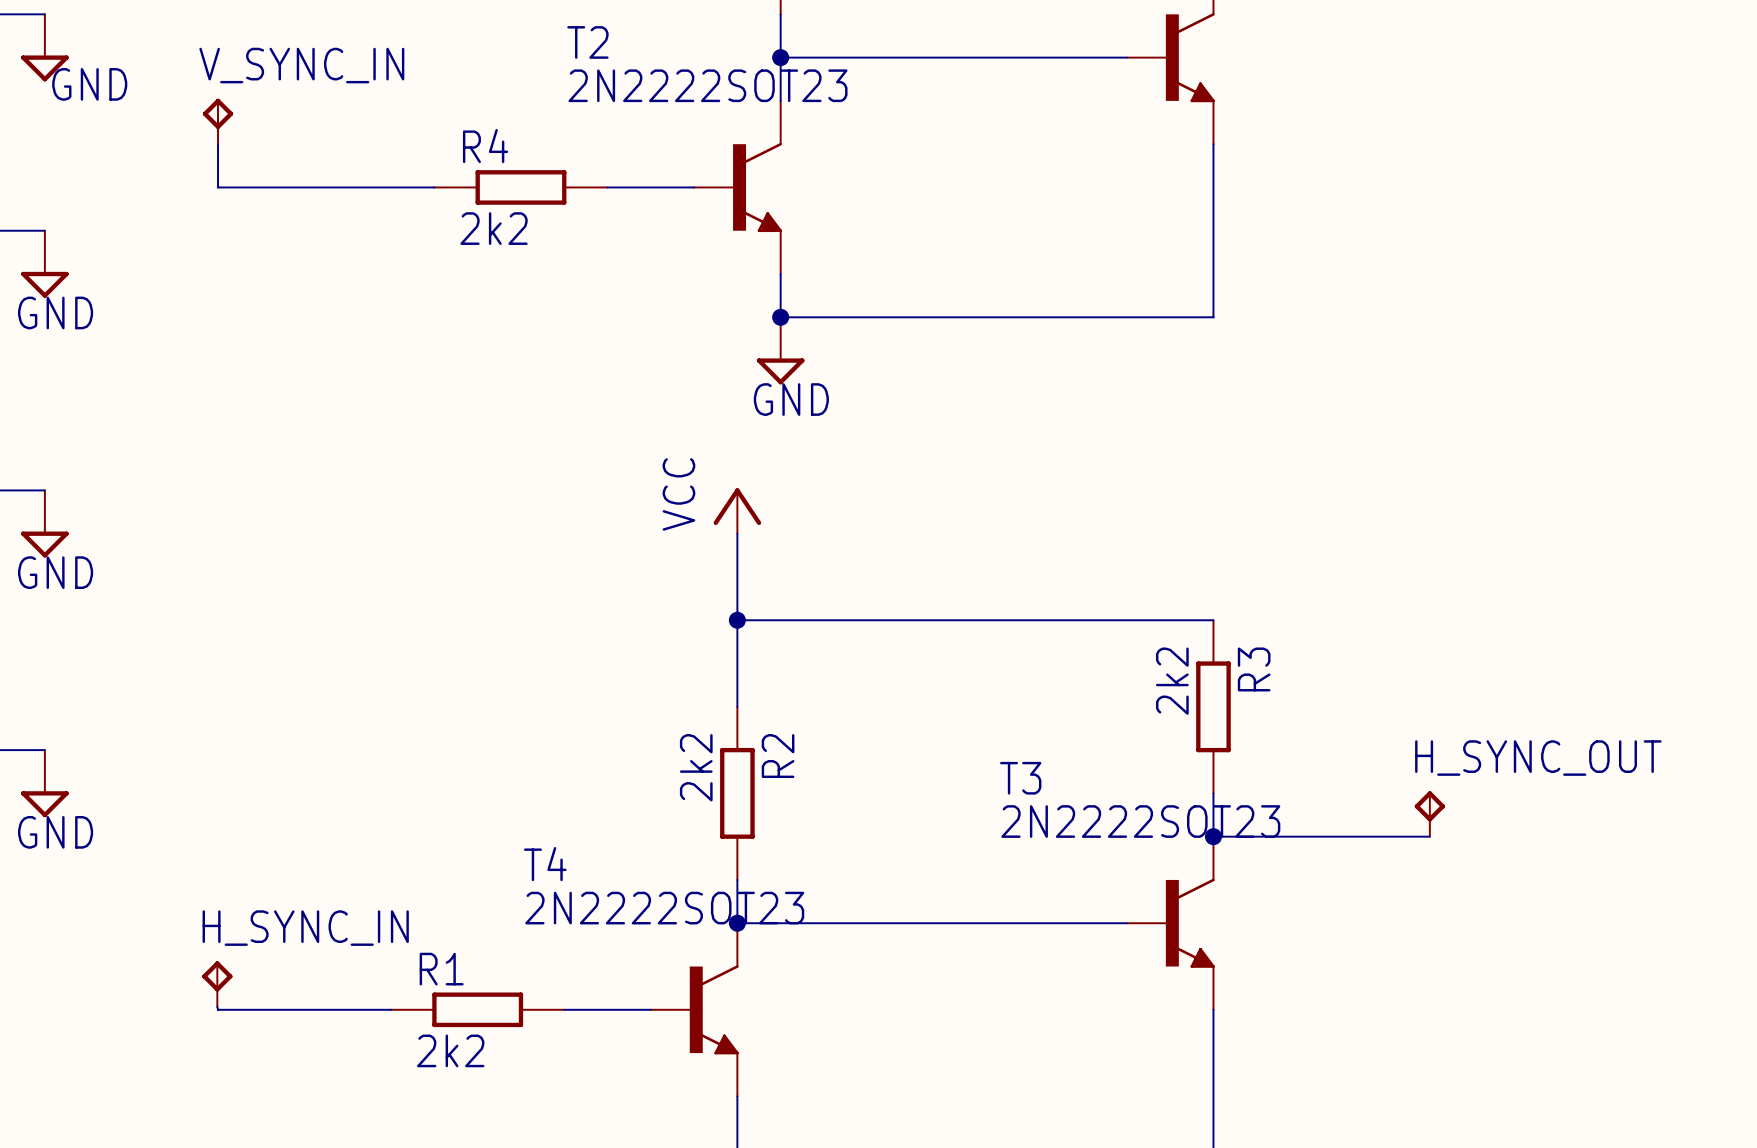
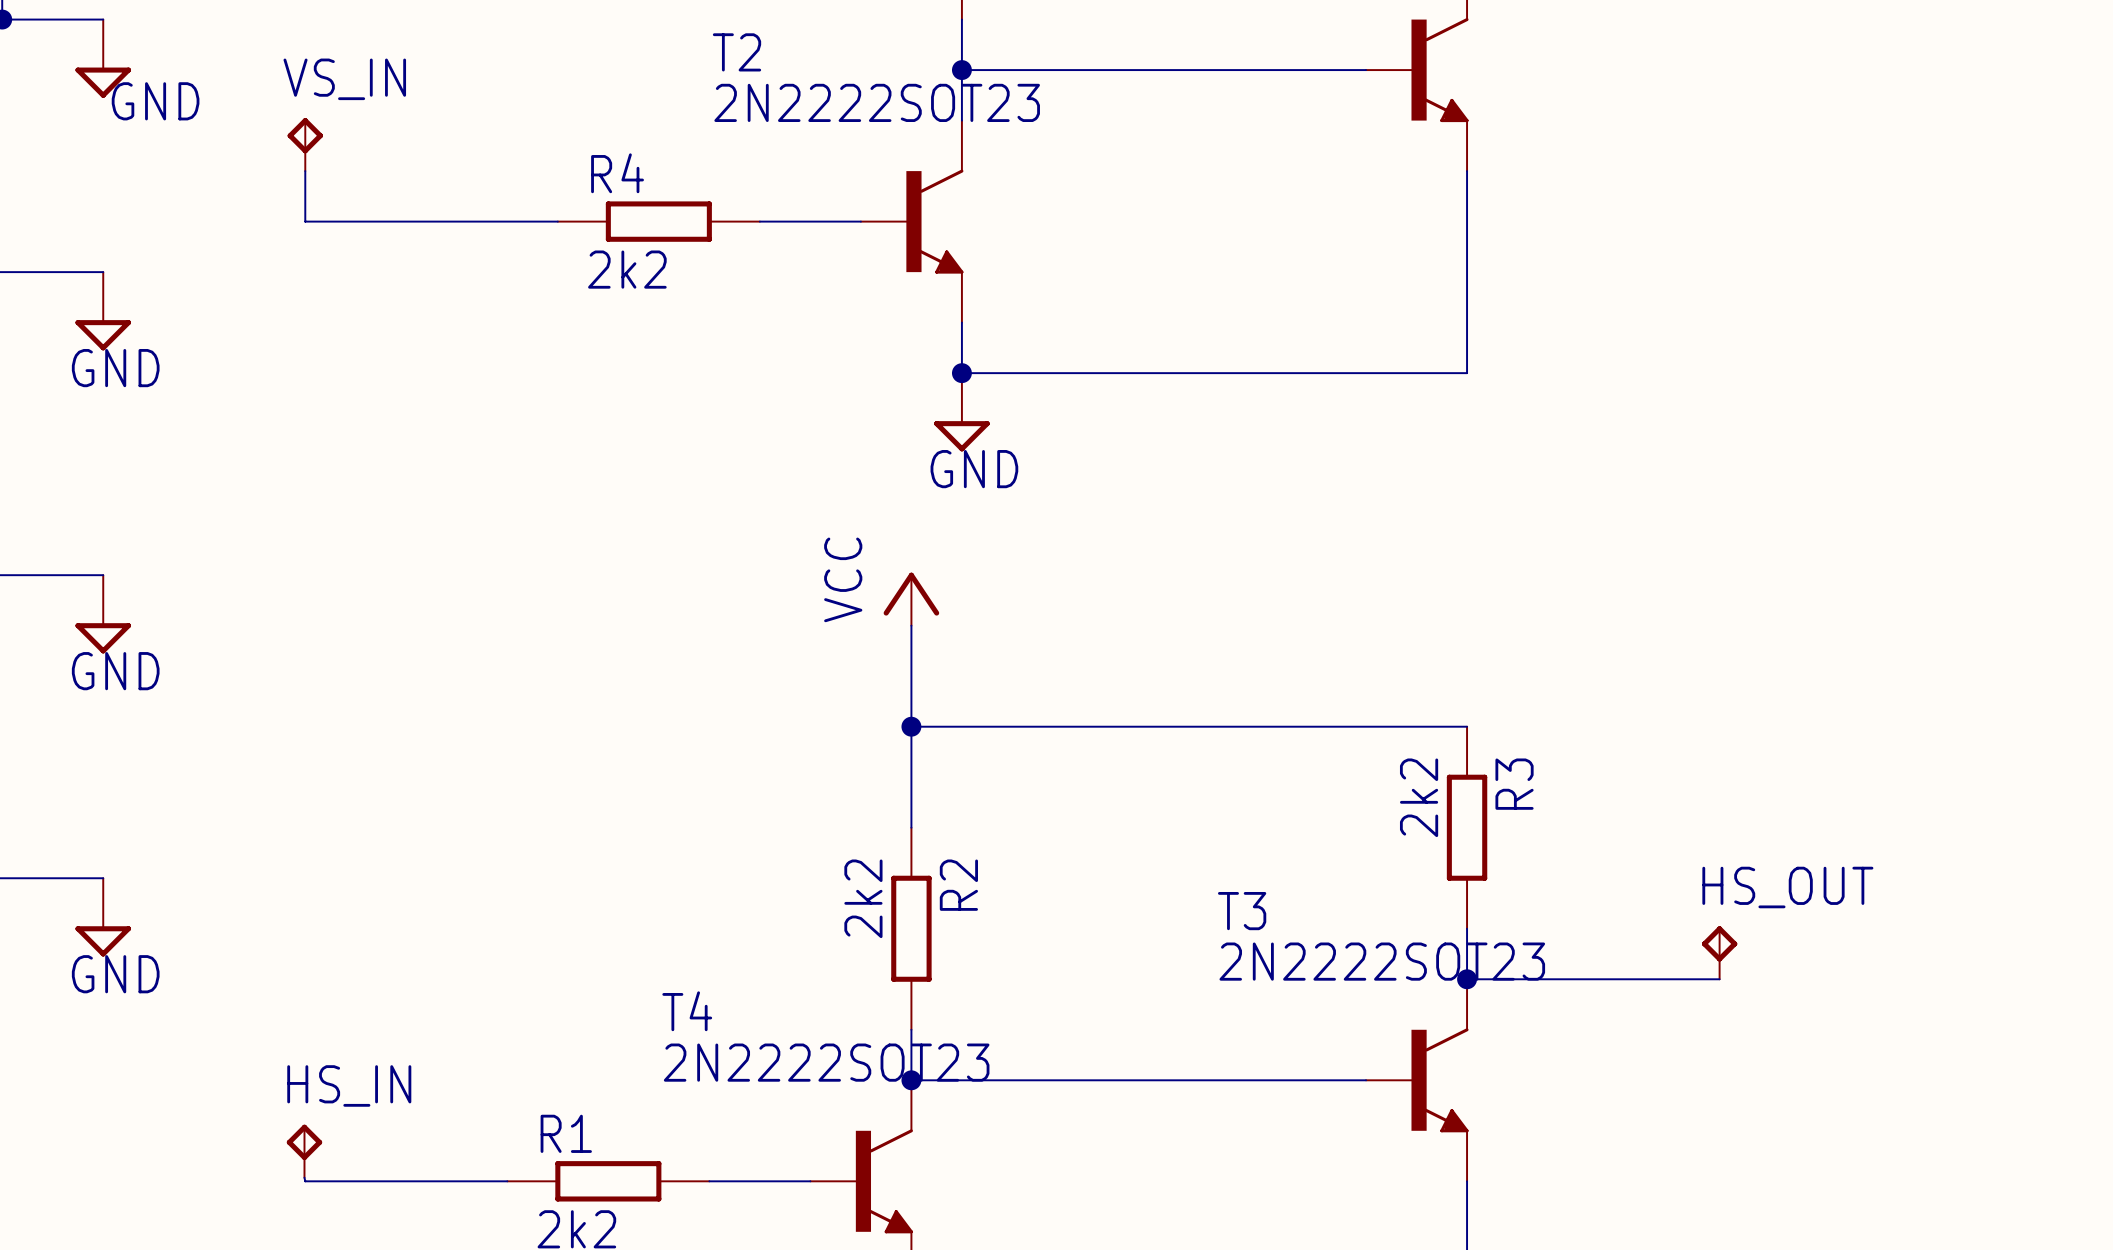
V_SYNC_IN name: V_SYNC_IN (301, 65) -> VS_IN (344, 79)
H_SYNC_OUT name: H_SYNC_OUT (1538, 758) -> HS_OUT (1787, 887)
H_SYNC_IN name: H_SYNC_IN (305, 928) -> HS_IN (349, 1085)

